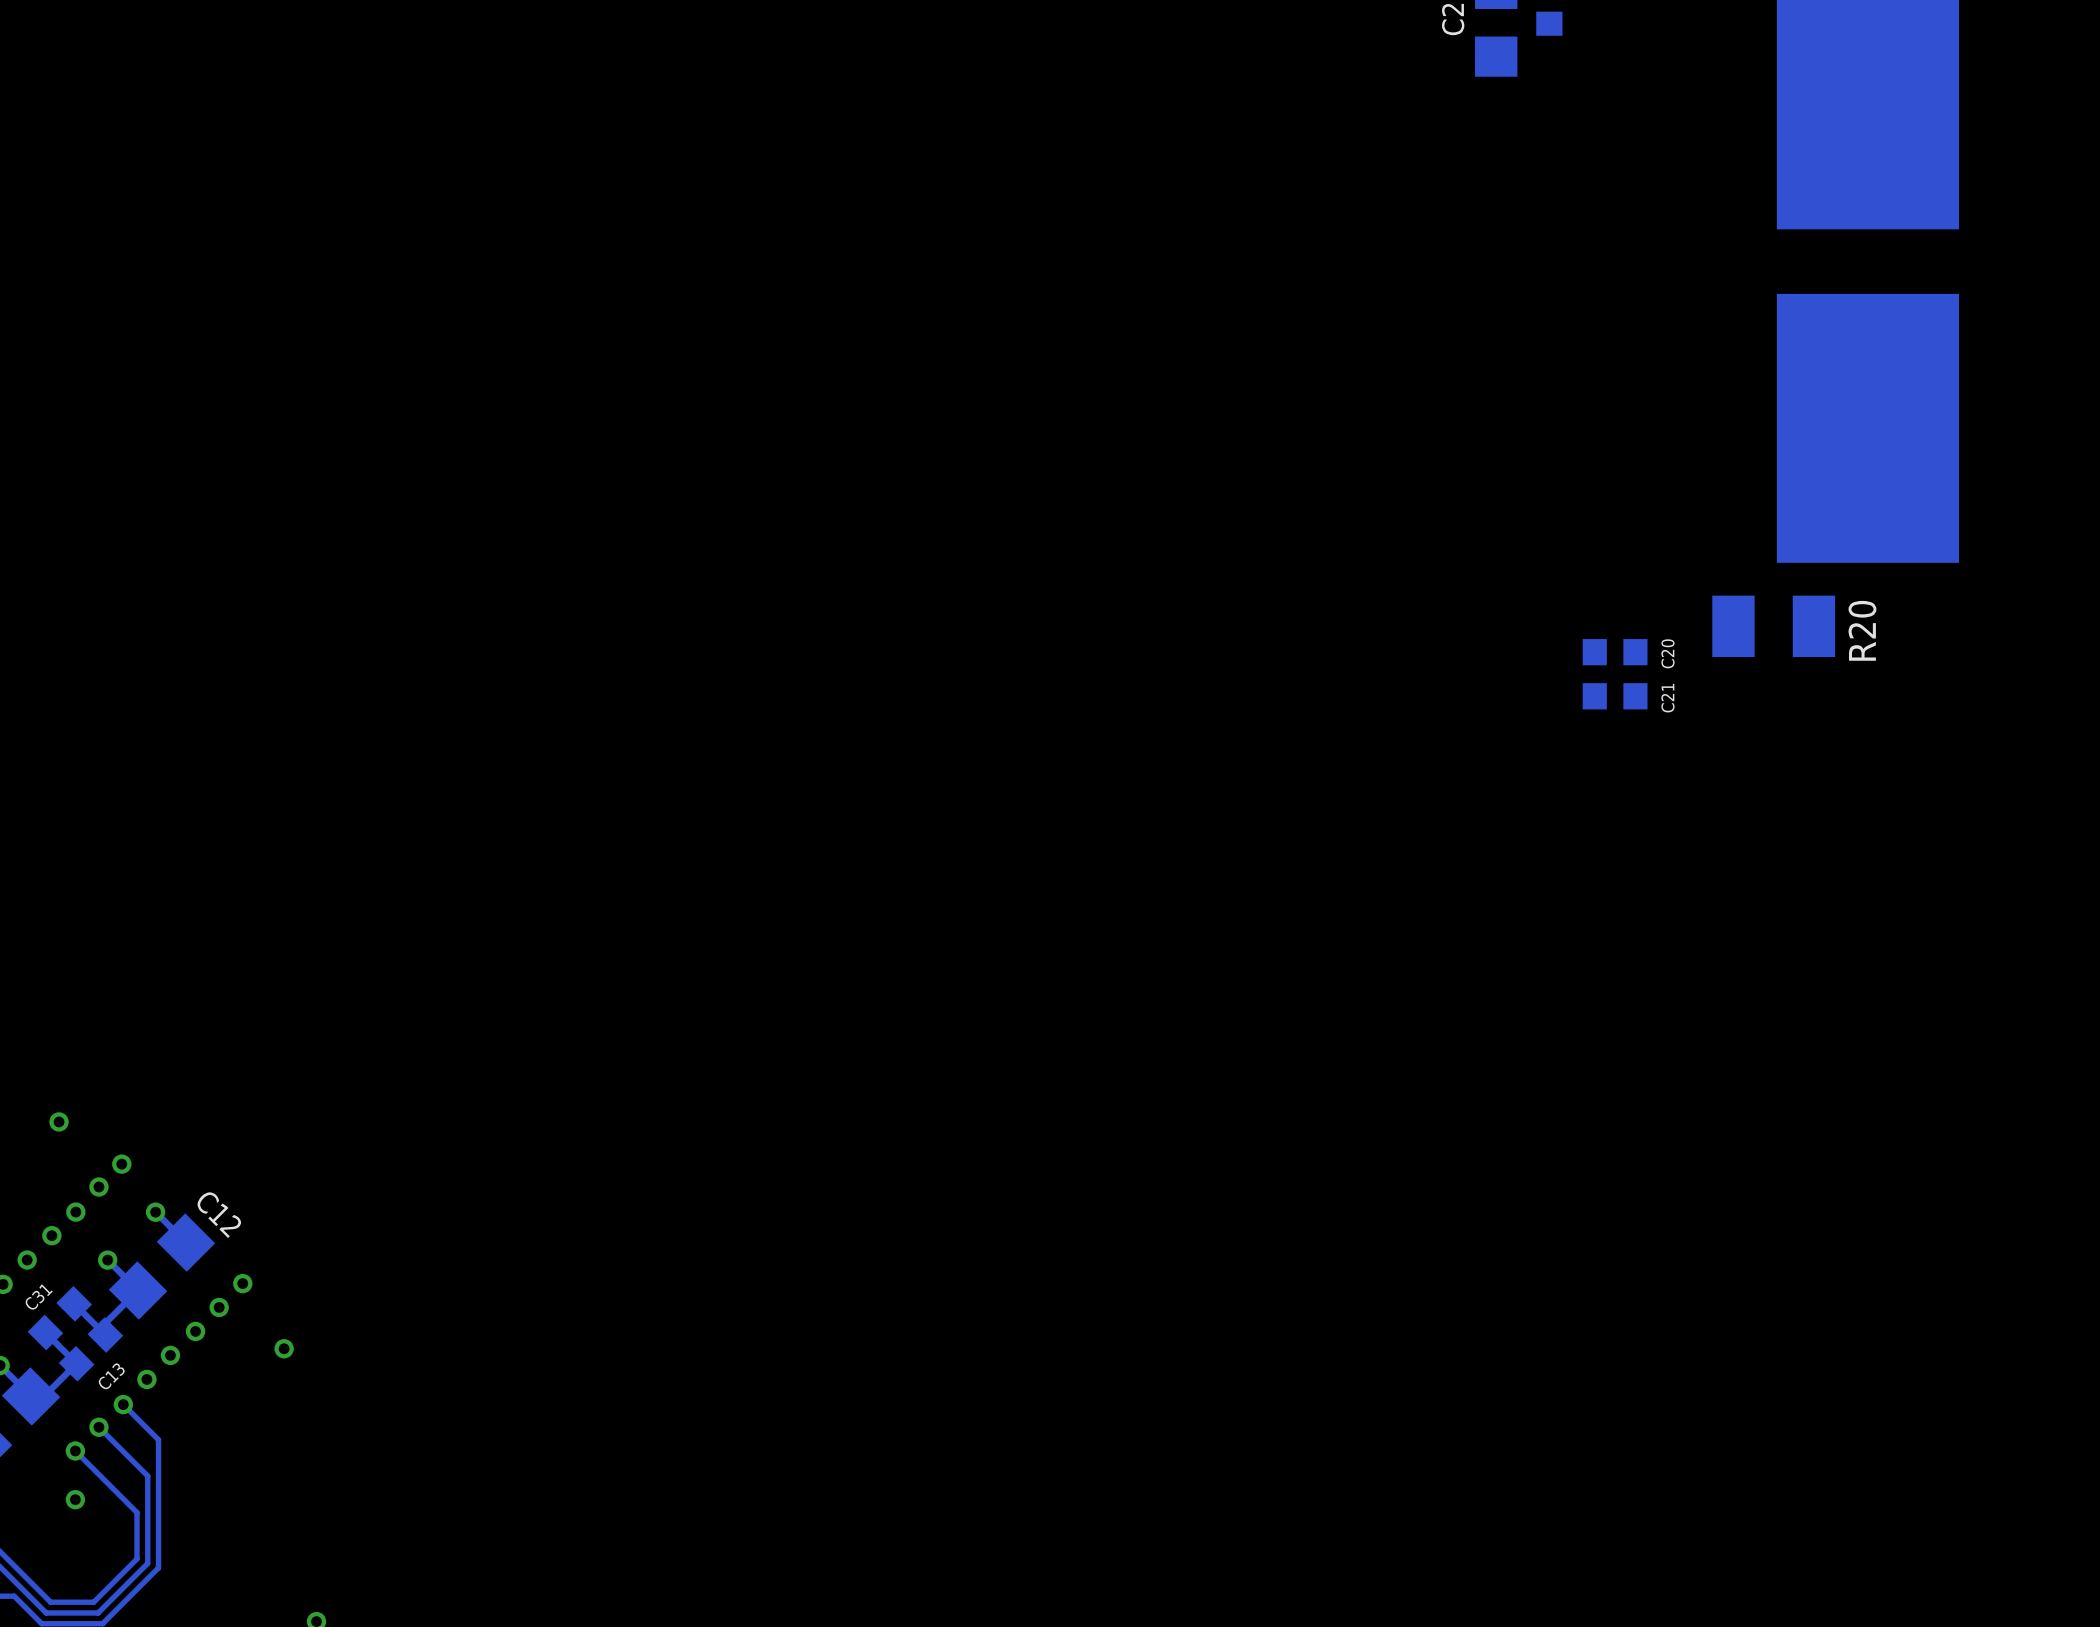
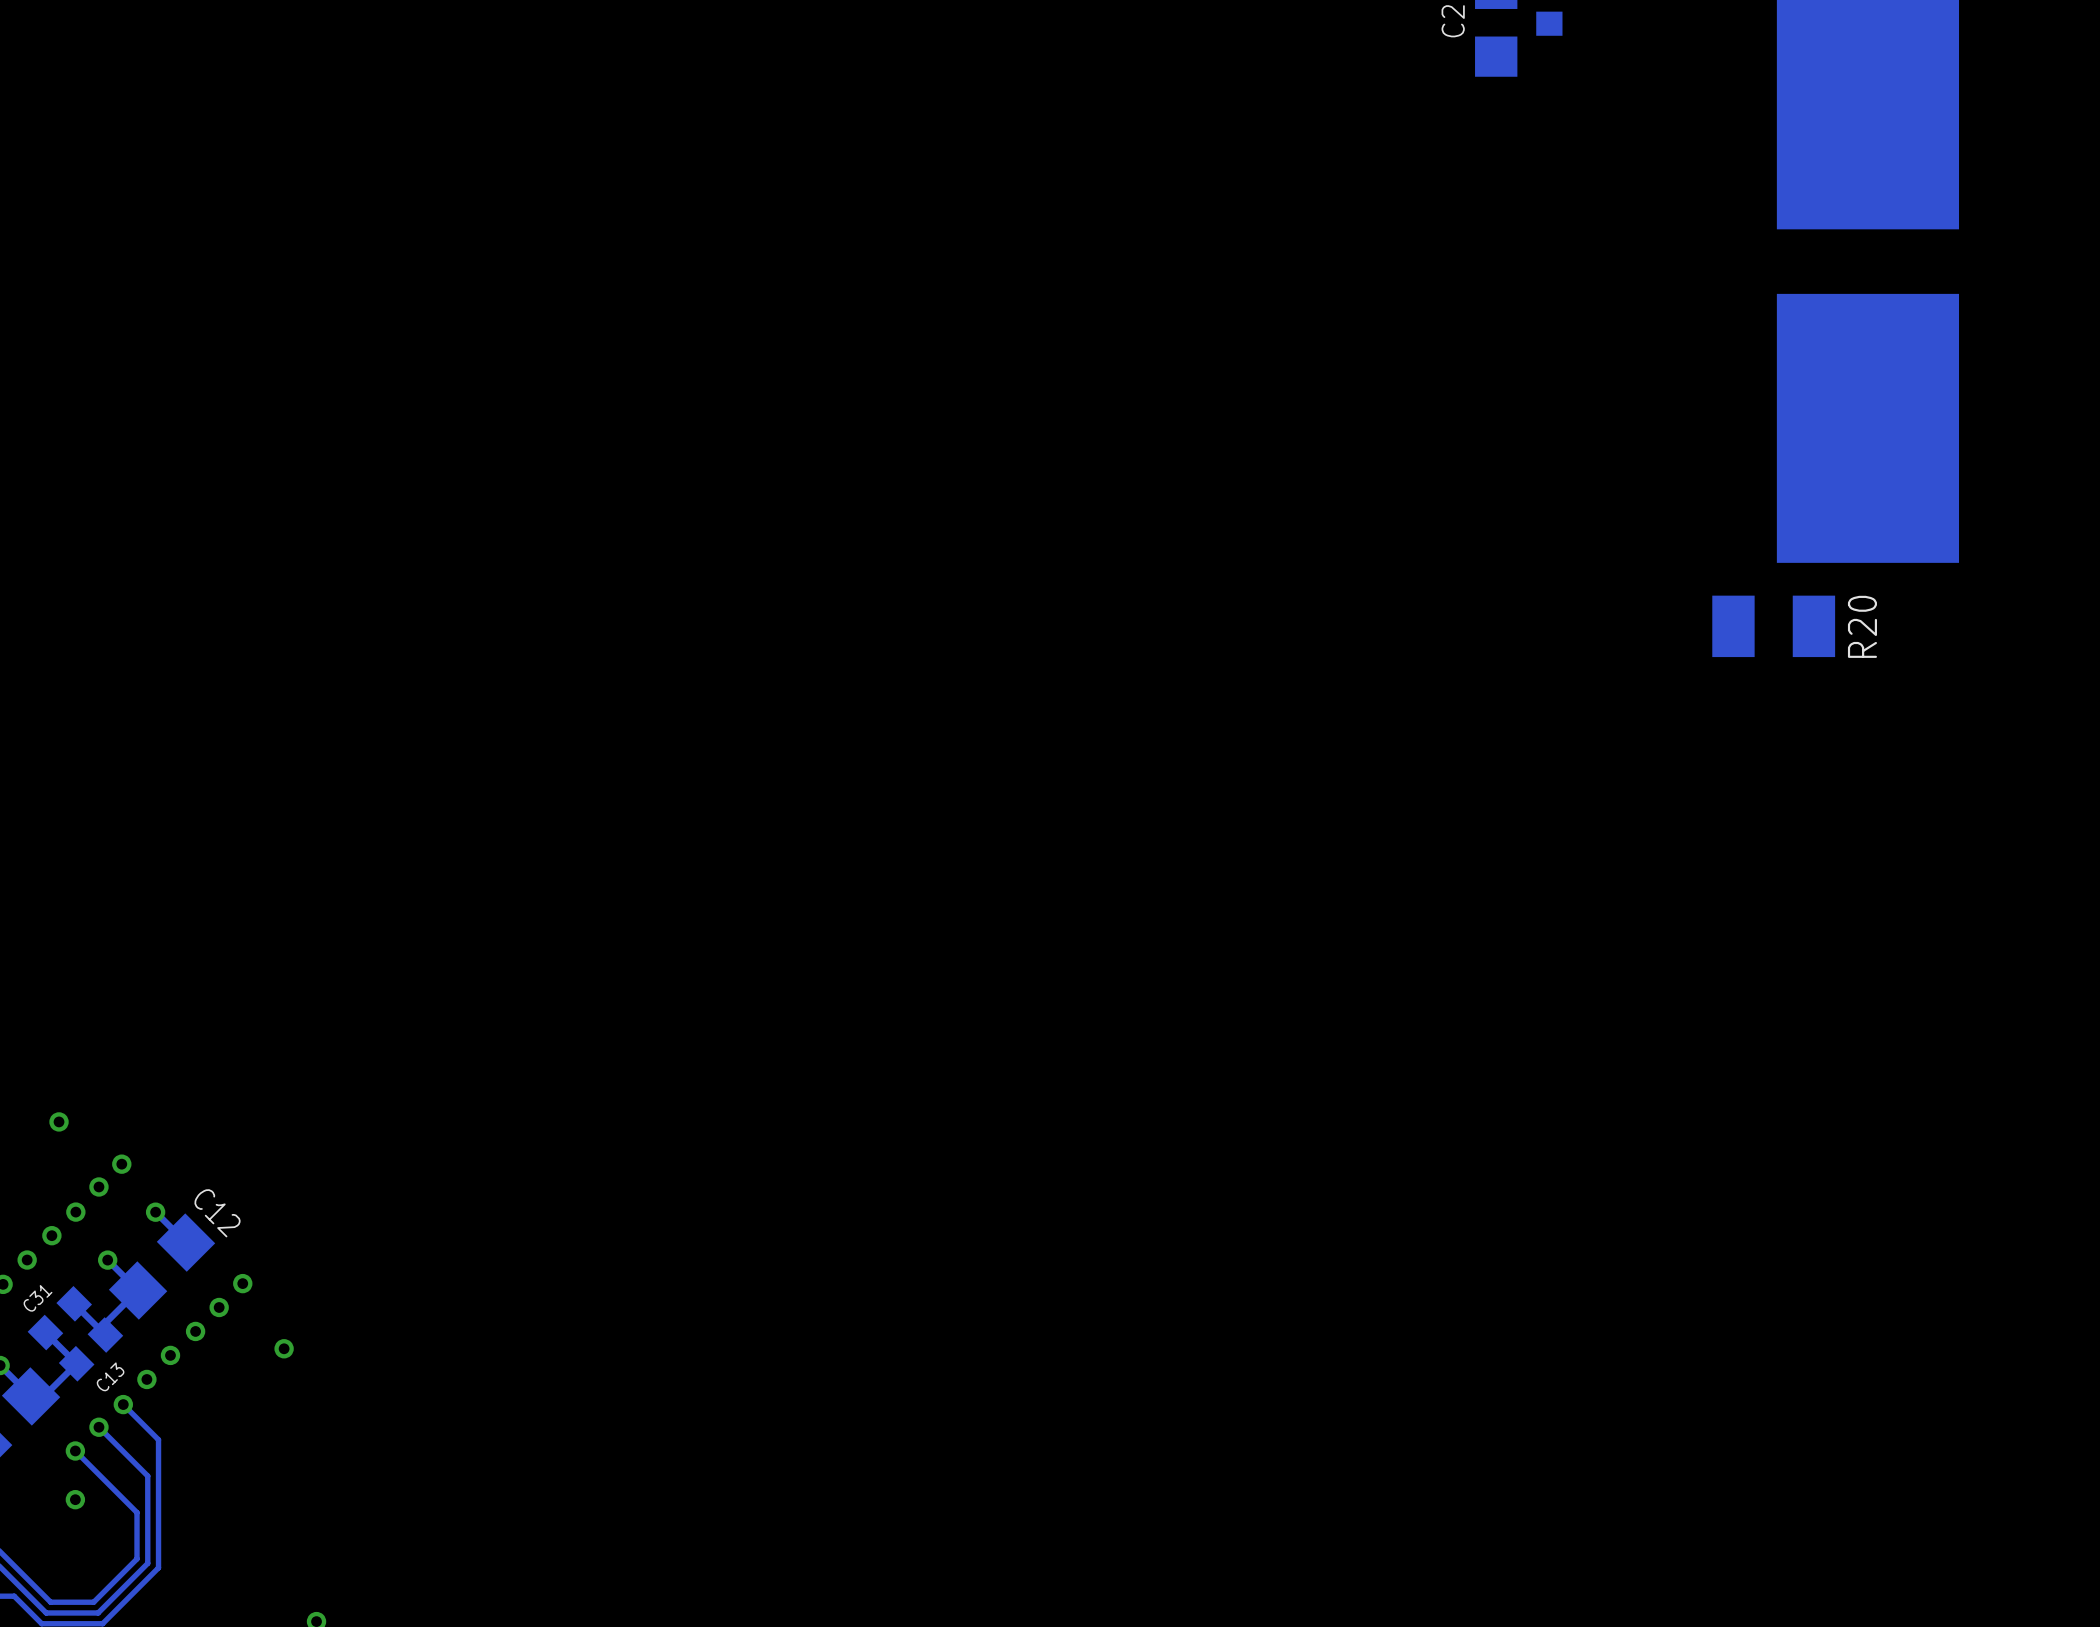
C20: (1615, 652) -> none
C21: (1615, 696) -> none

